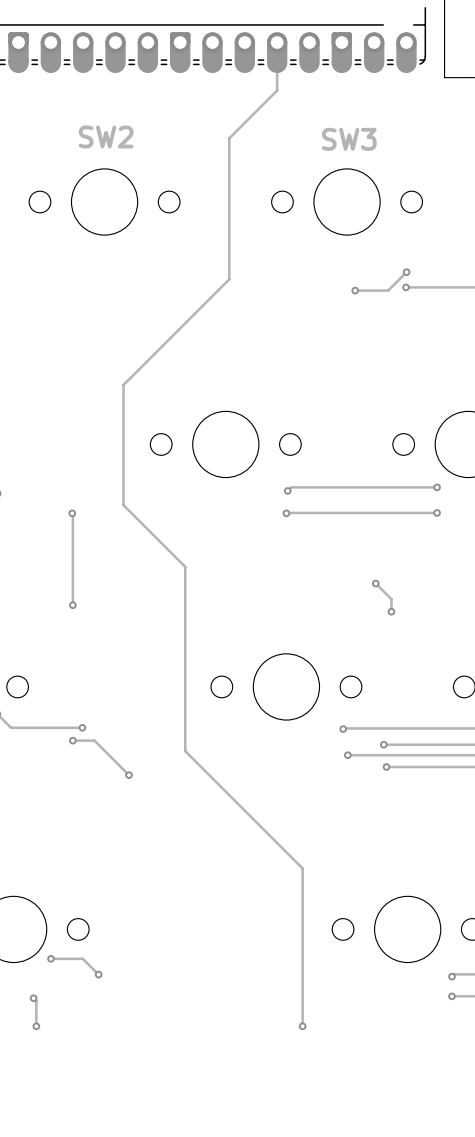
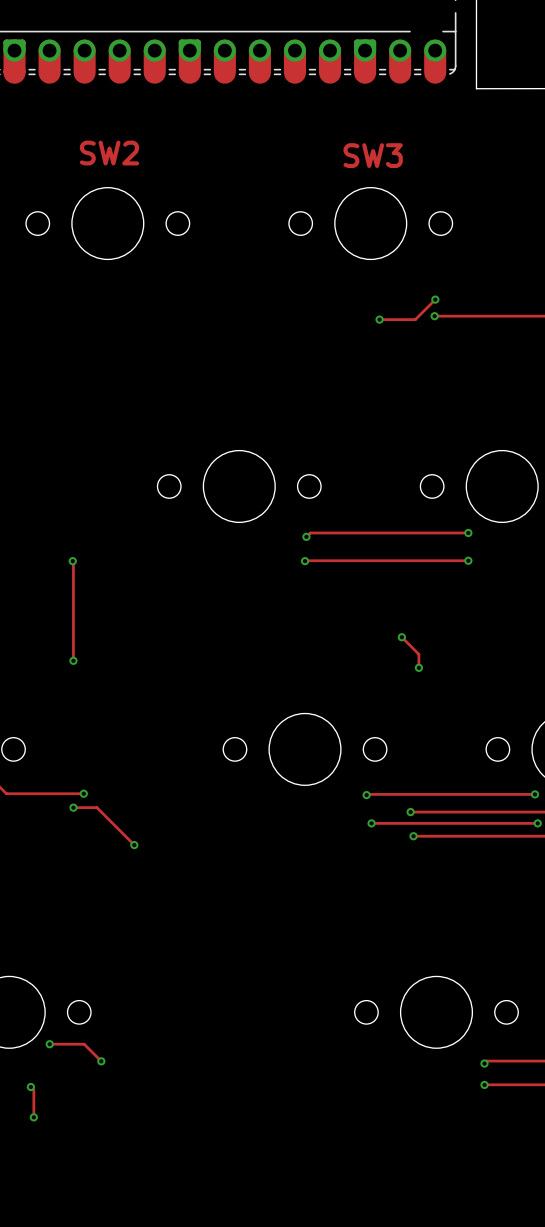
track: (277, 55) (277, 90) (229, 138) (229, 279) (123, 385) (123, 505) (185, 566) (185, 751) (302, 868) (302, 1026) -> none
via: (302, 1026) -> none

